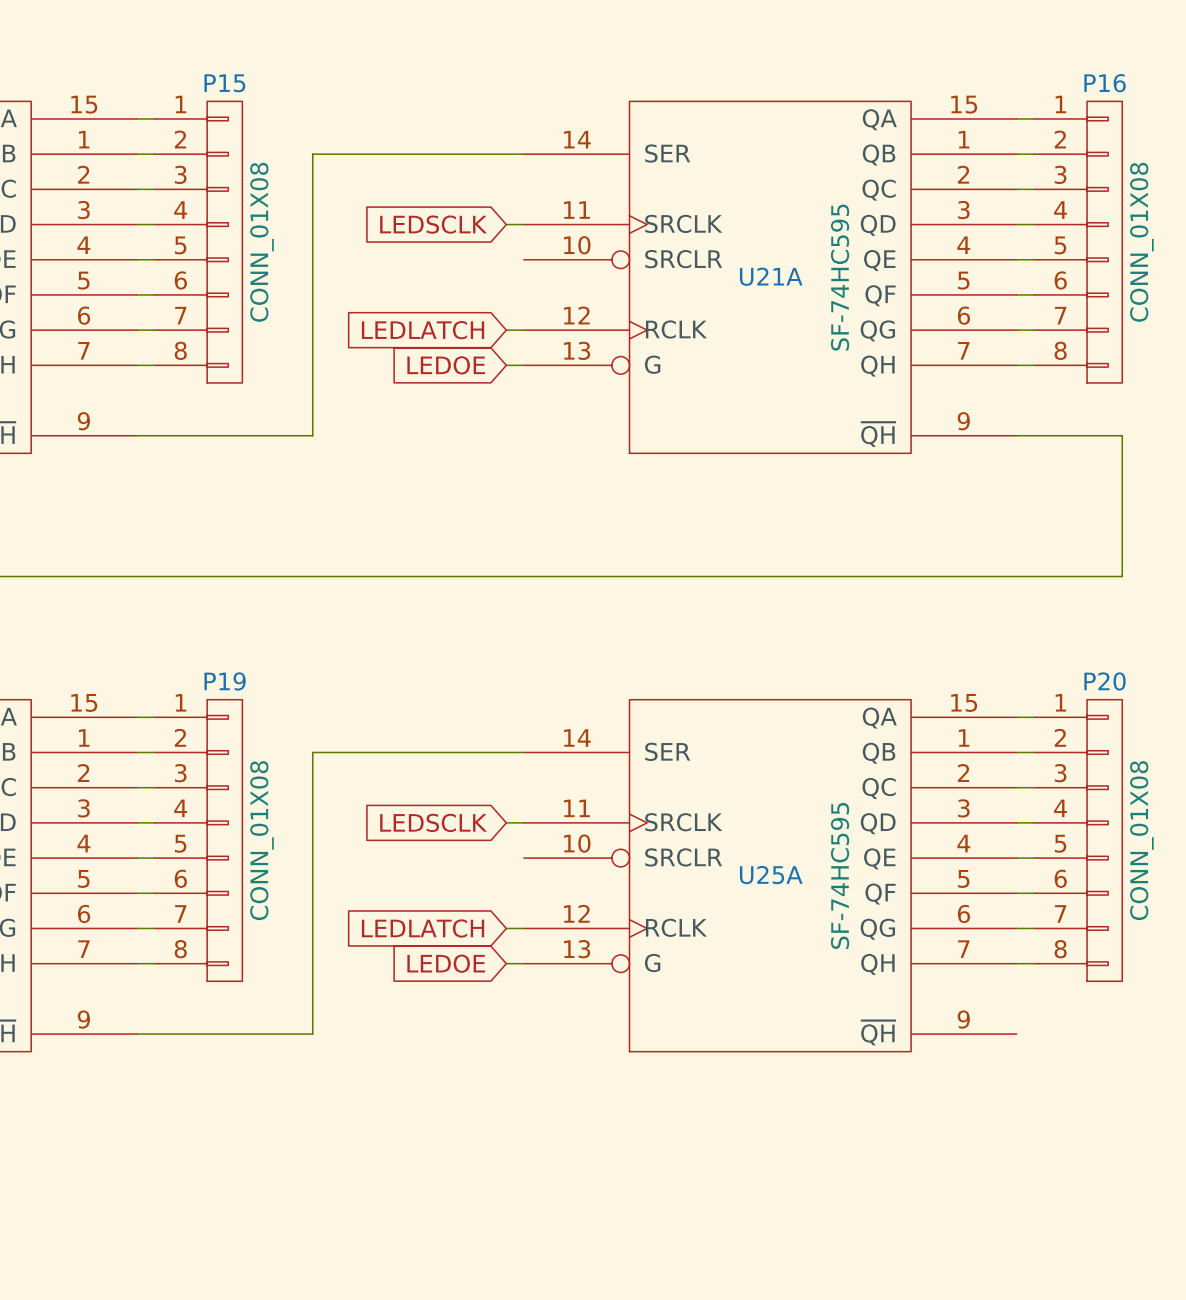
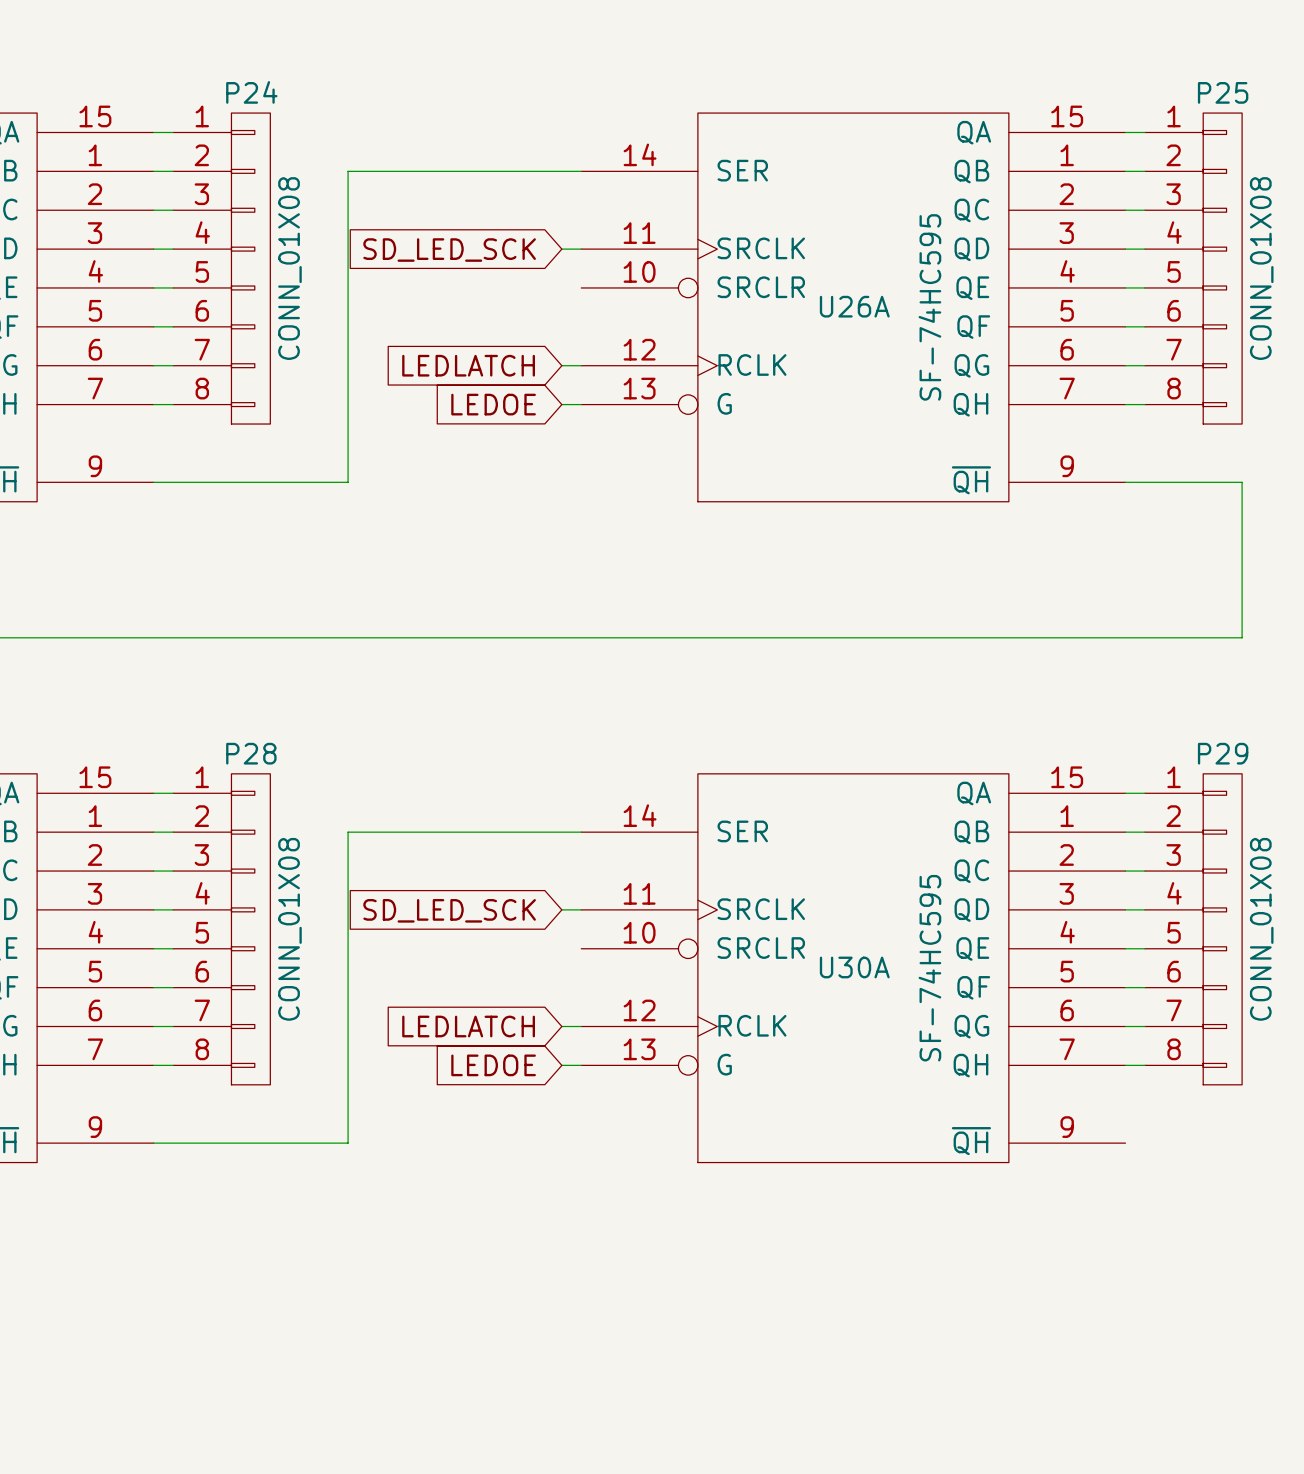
P15 name: P15 (224, 83) -> P24 (251, 92)
P16 name: P16 (1105, 83) -> P25 (1223, 92)
global label: LEDSCLK (433, 224) -> SD_LED_SCK (449, 250)
U21A name: U21A (771, 276) -> U26A (854, 306)
P19 name: P19 (225, 681) -> P28 (251, 753)
P20 name: P20 (1105, 681) -> P29 (1223, 753)
global label: LEDSCLK (433, 822) -> SD_LED_SCK (449, 910)
U25A name: U25A (771, 875) -> U30A (854, 967)

